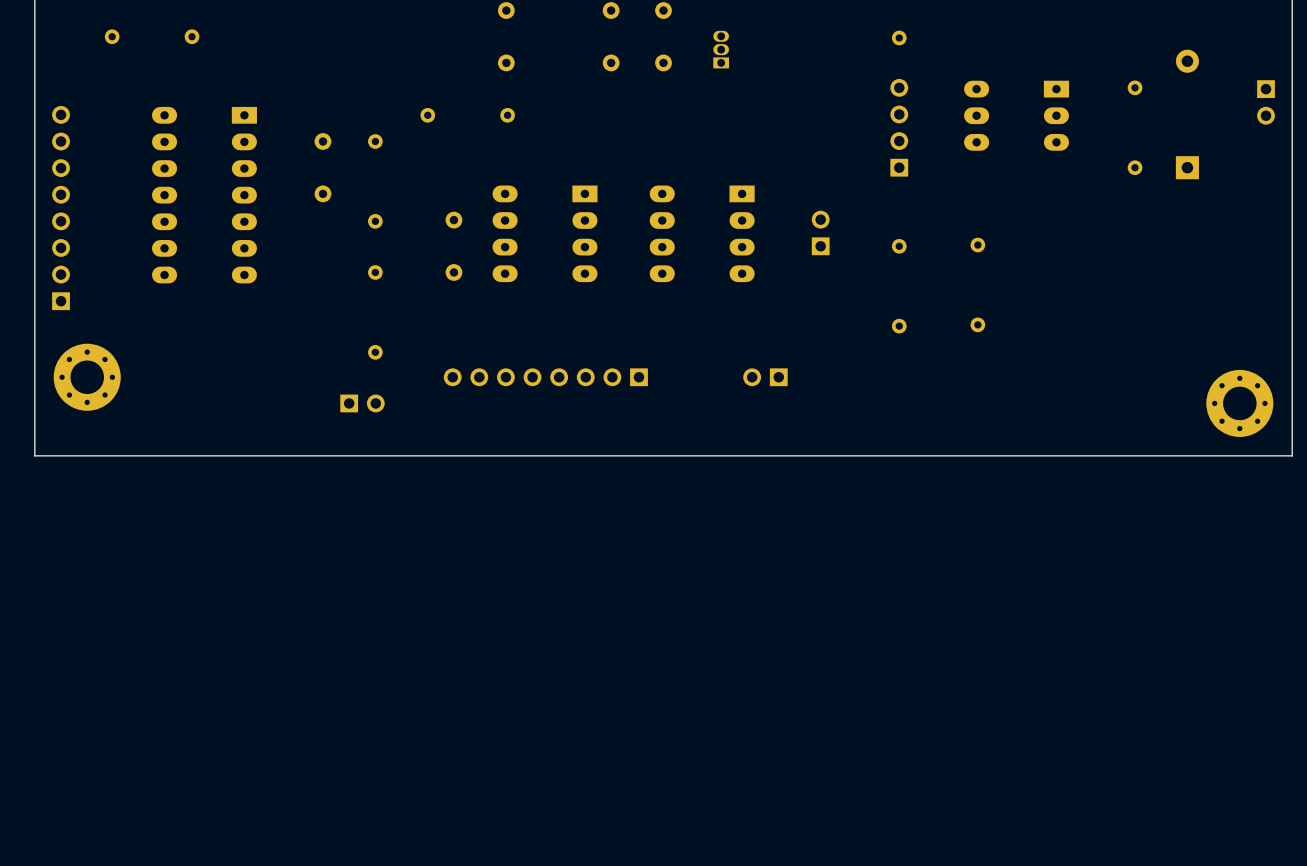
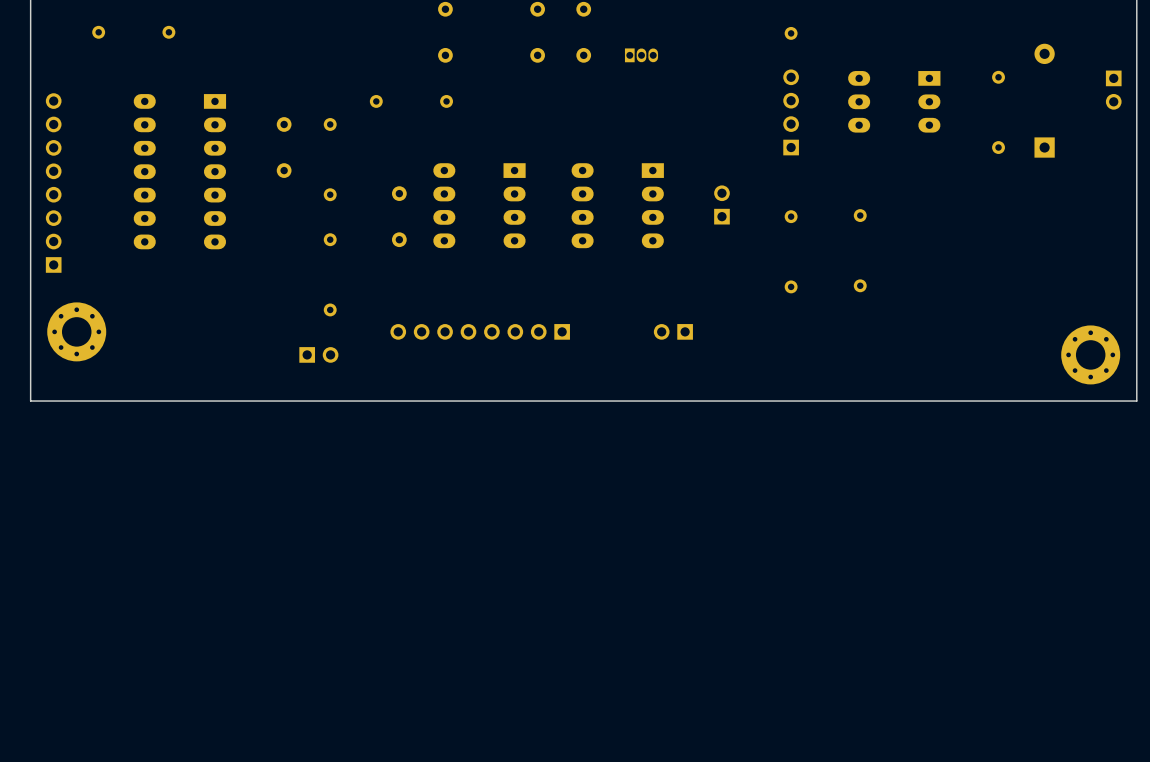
part rotation: 0° (721, 49) -> 90° clockwise (641, 55)

